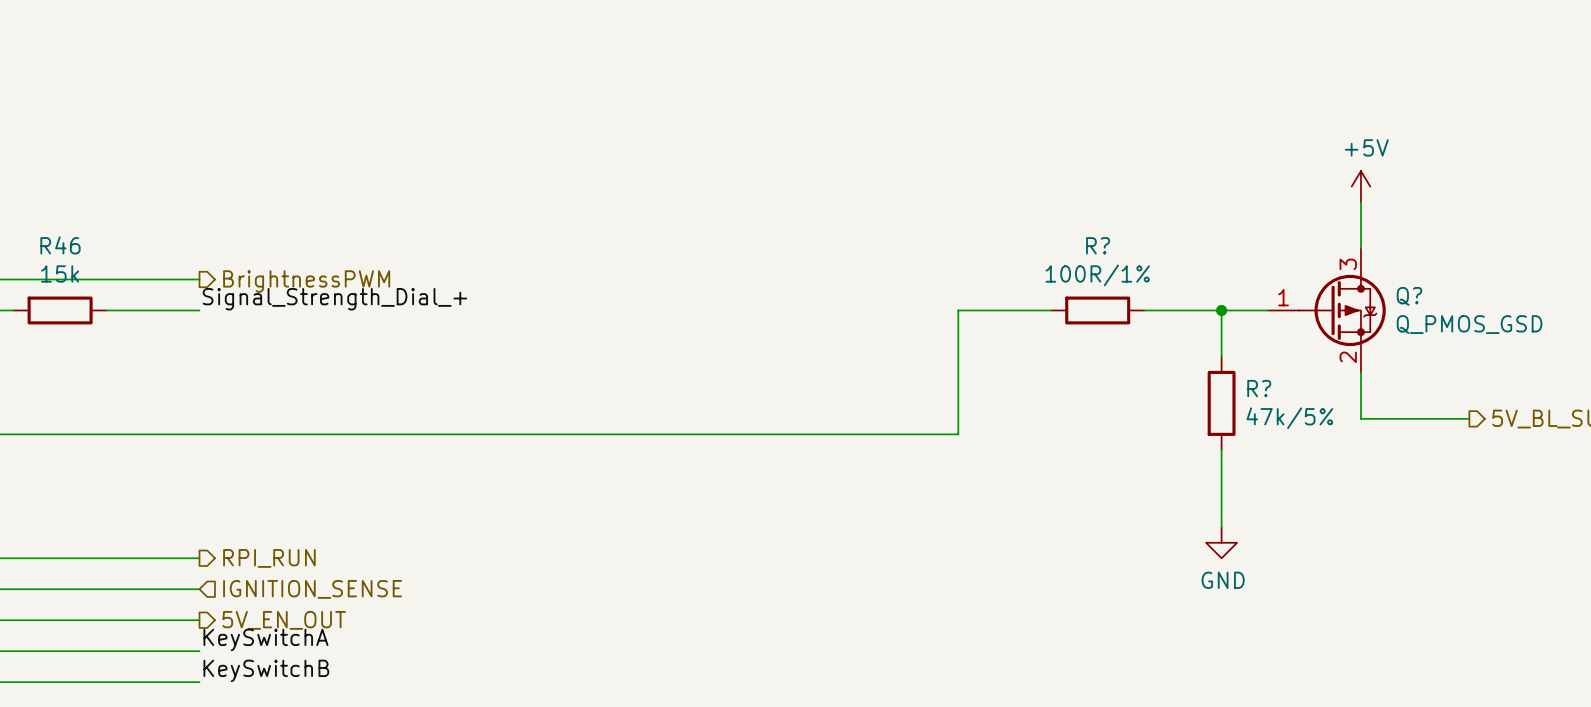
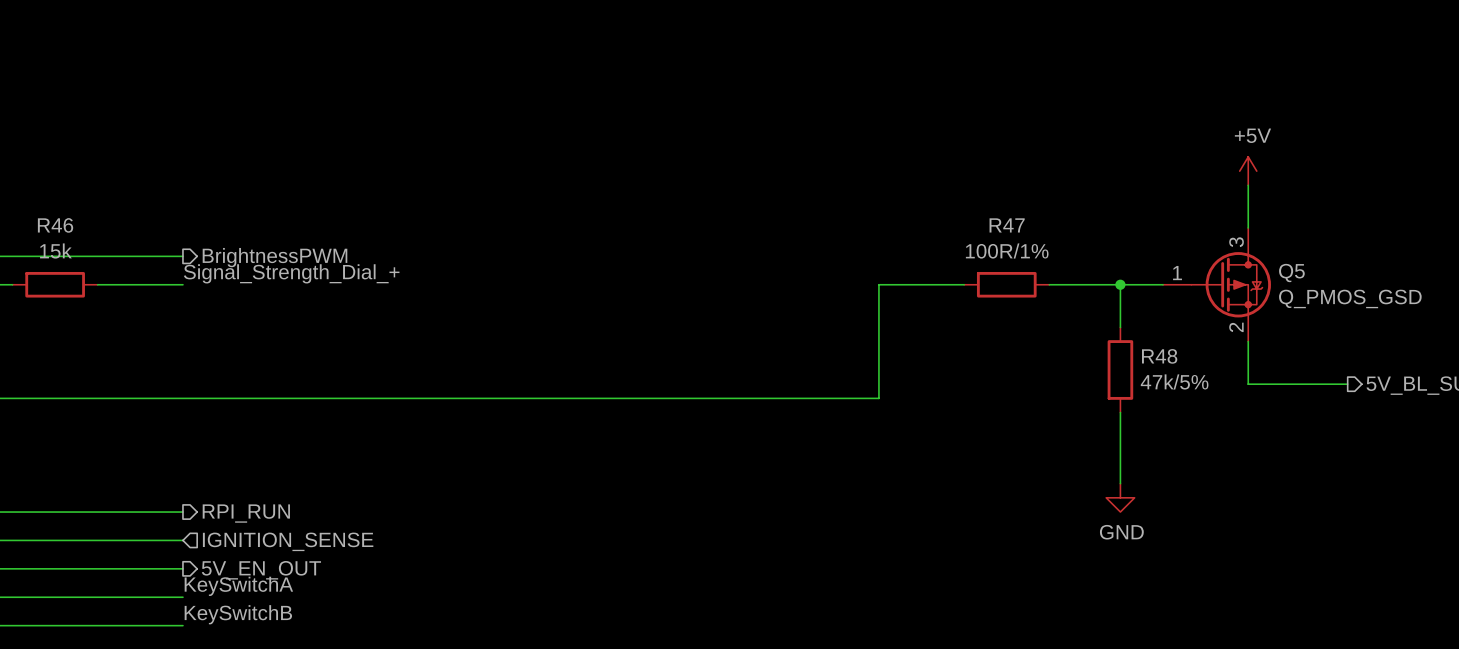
R? name: R? (1098, 245) -> R47 (1007, 225)
Q? name: Q? (1409, 296) -> Q5 (1291, 273)
R? name: R? (1259, 388) -> R48 (1159, 356)

